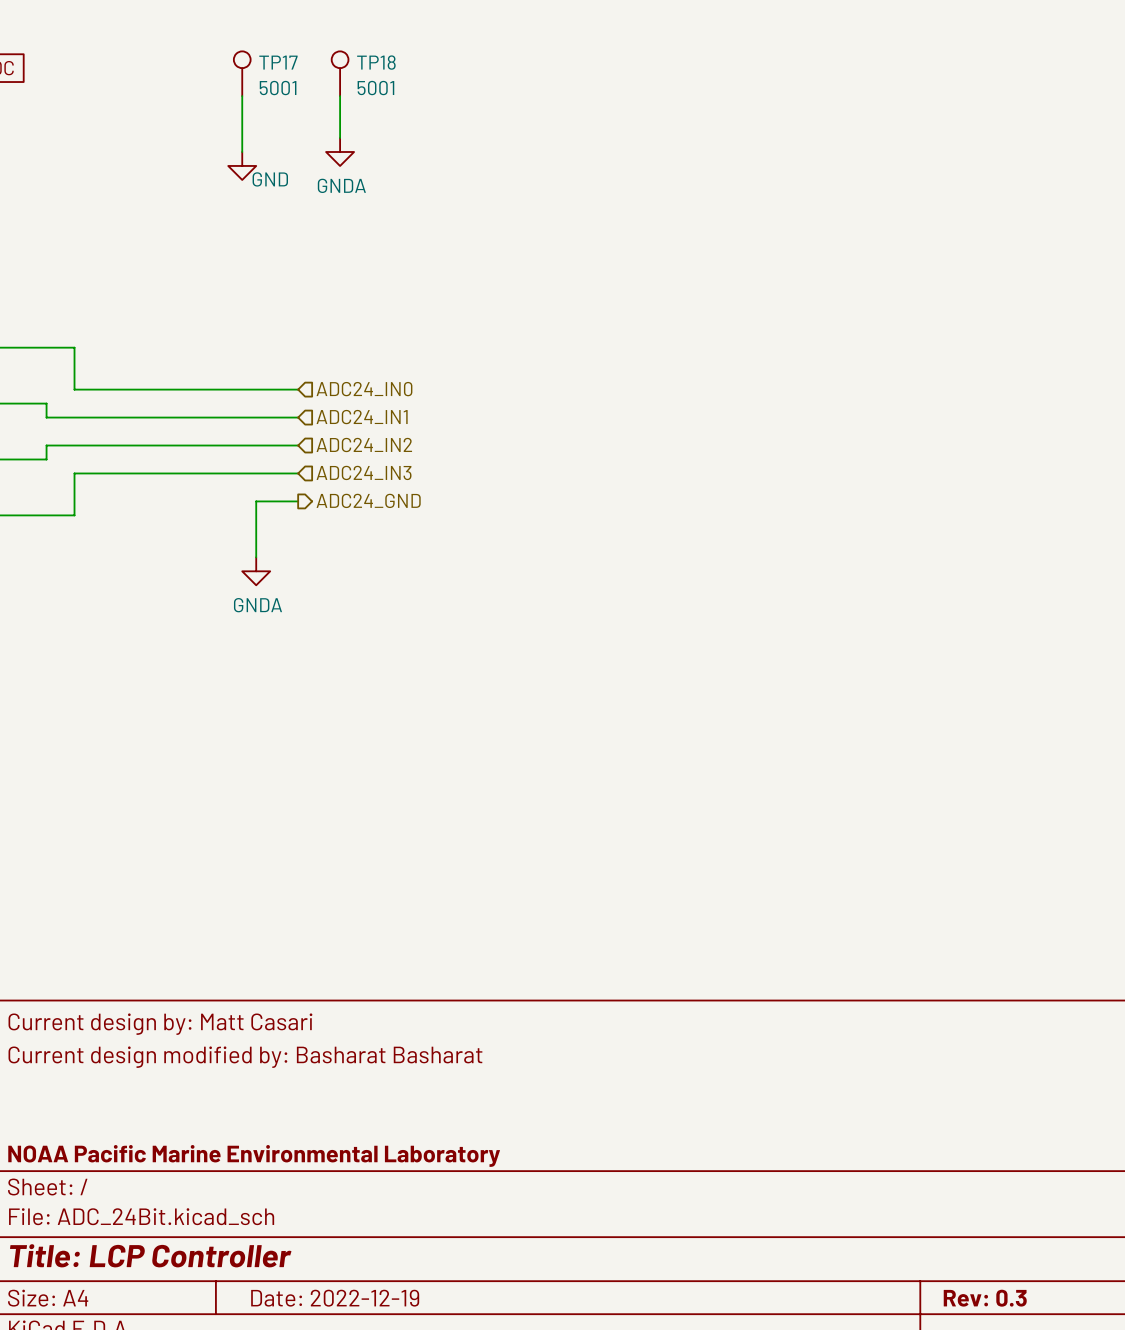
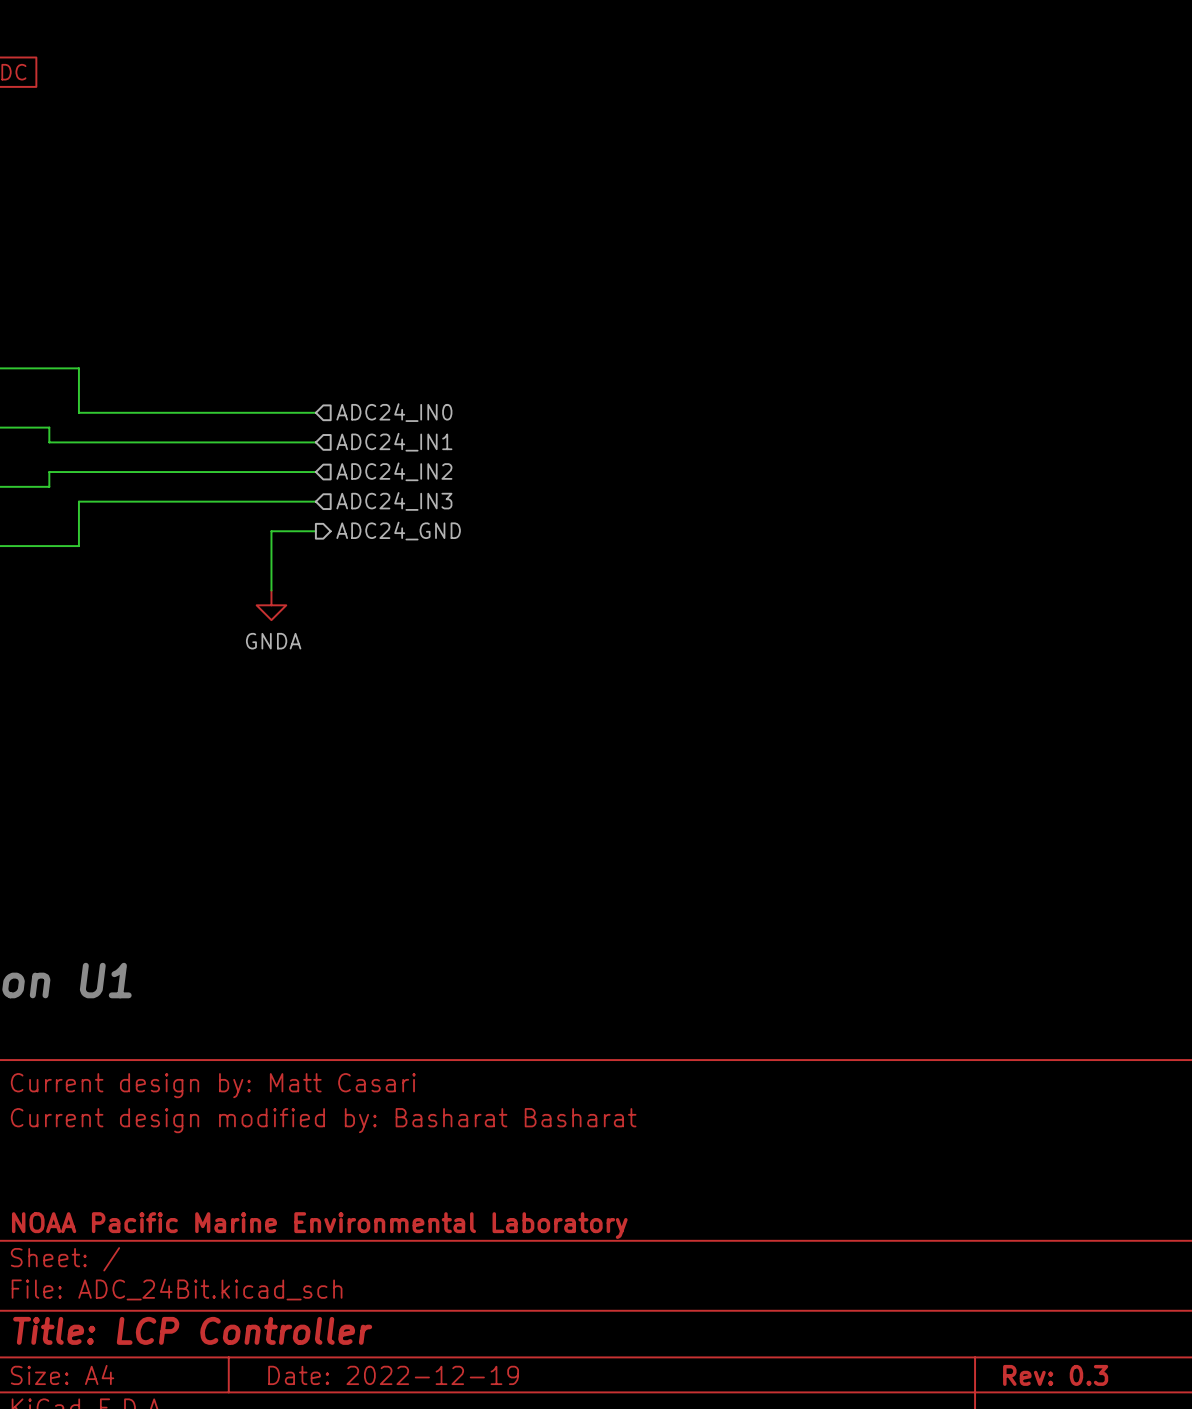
TP17: 5001 (242, 73) -> none
TP18: 5001 (340, 73) -> none
wire: (242, 96) (242, 152) -> none
wire: (340, 96) (340, 138) -> none
power symbol: GNDA (340, 152) -> none
power symbol: GND (242, 165) -> none

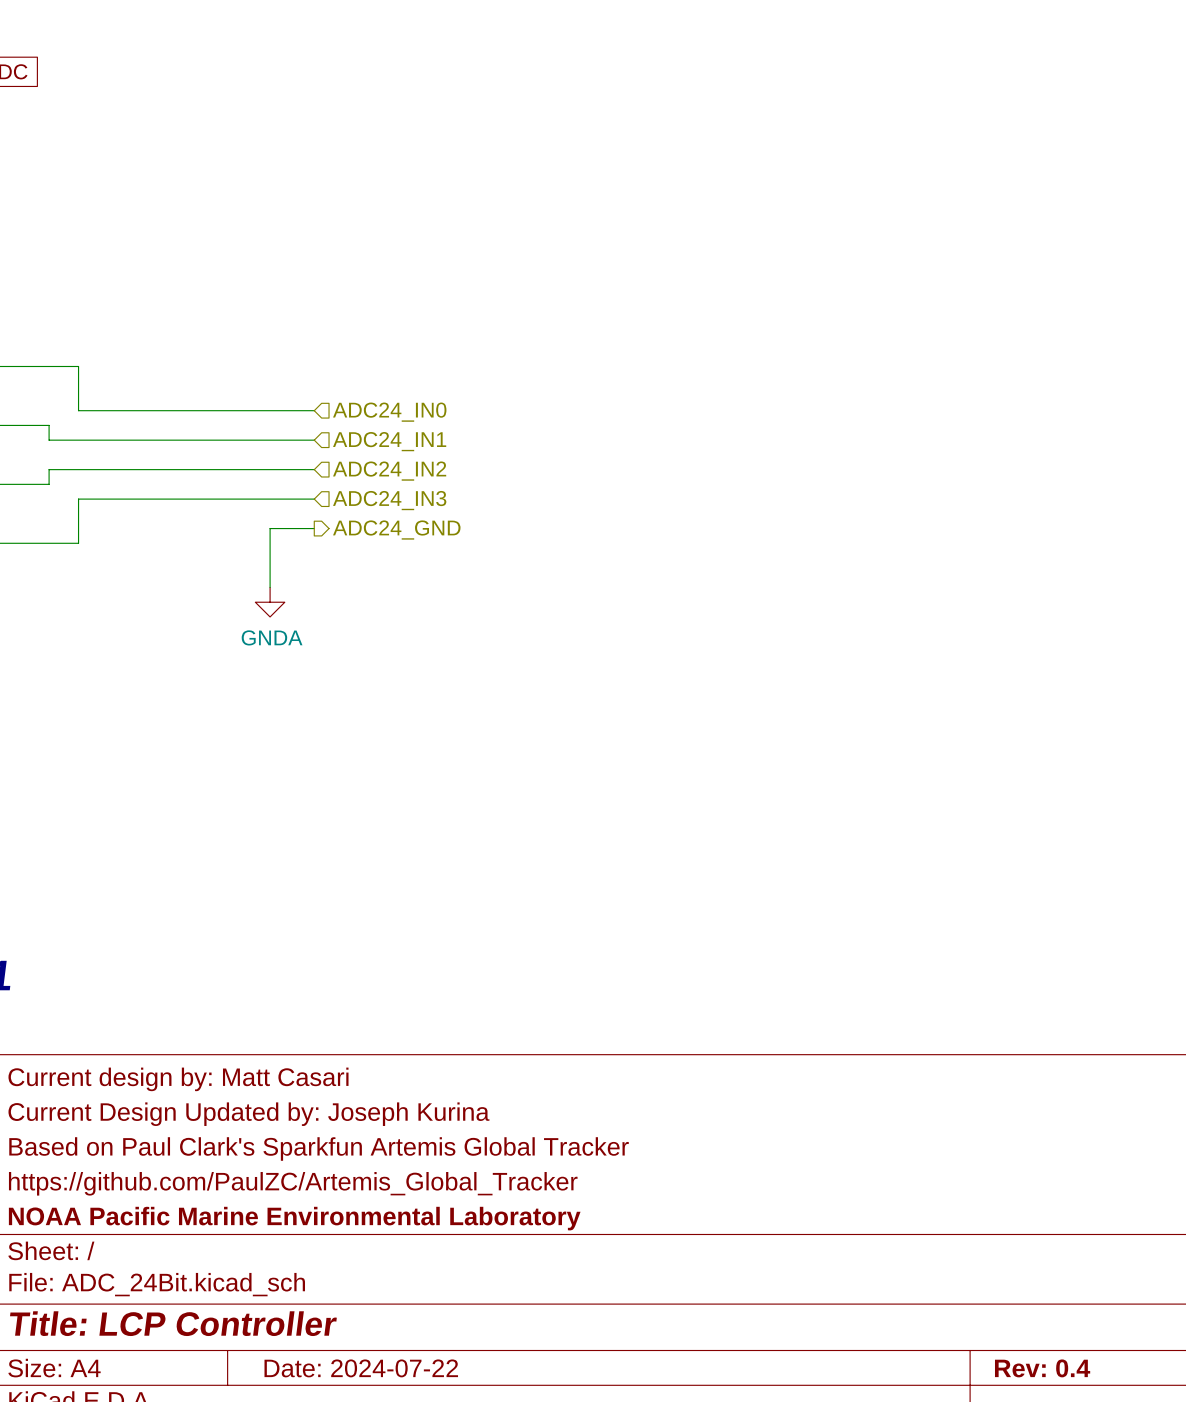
title block: Current design modified by: Basharat Basharat (323, 1120) -> Current Design Updated by: Joseph Kurina (248, 1114)
title block: none -> Based on Paul Clark's Sparkfun Artemis Global Tracker (319, 1148)
title block: none -> https://github.com/PaulZC/Artemis_Global_Tracker (293, 1183)
title block: Date: 2022-12-19 (393, 1375) -> Date: 2024-07-22 (361, 1368)
title block: Rev: 0.3 (1055, 1375) -> Rev: 0.4 (1042, 1368)

